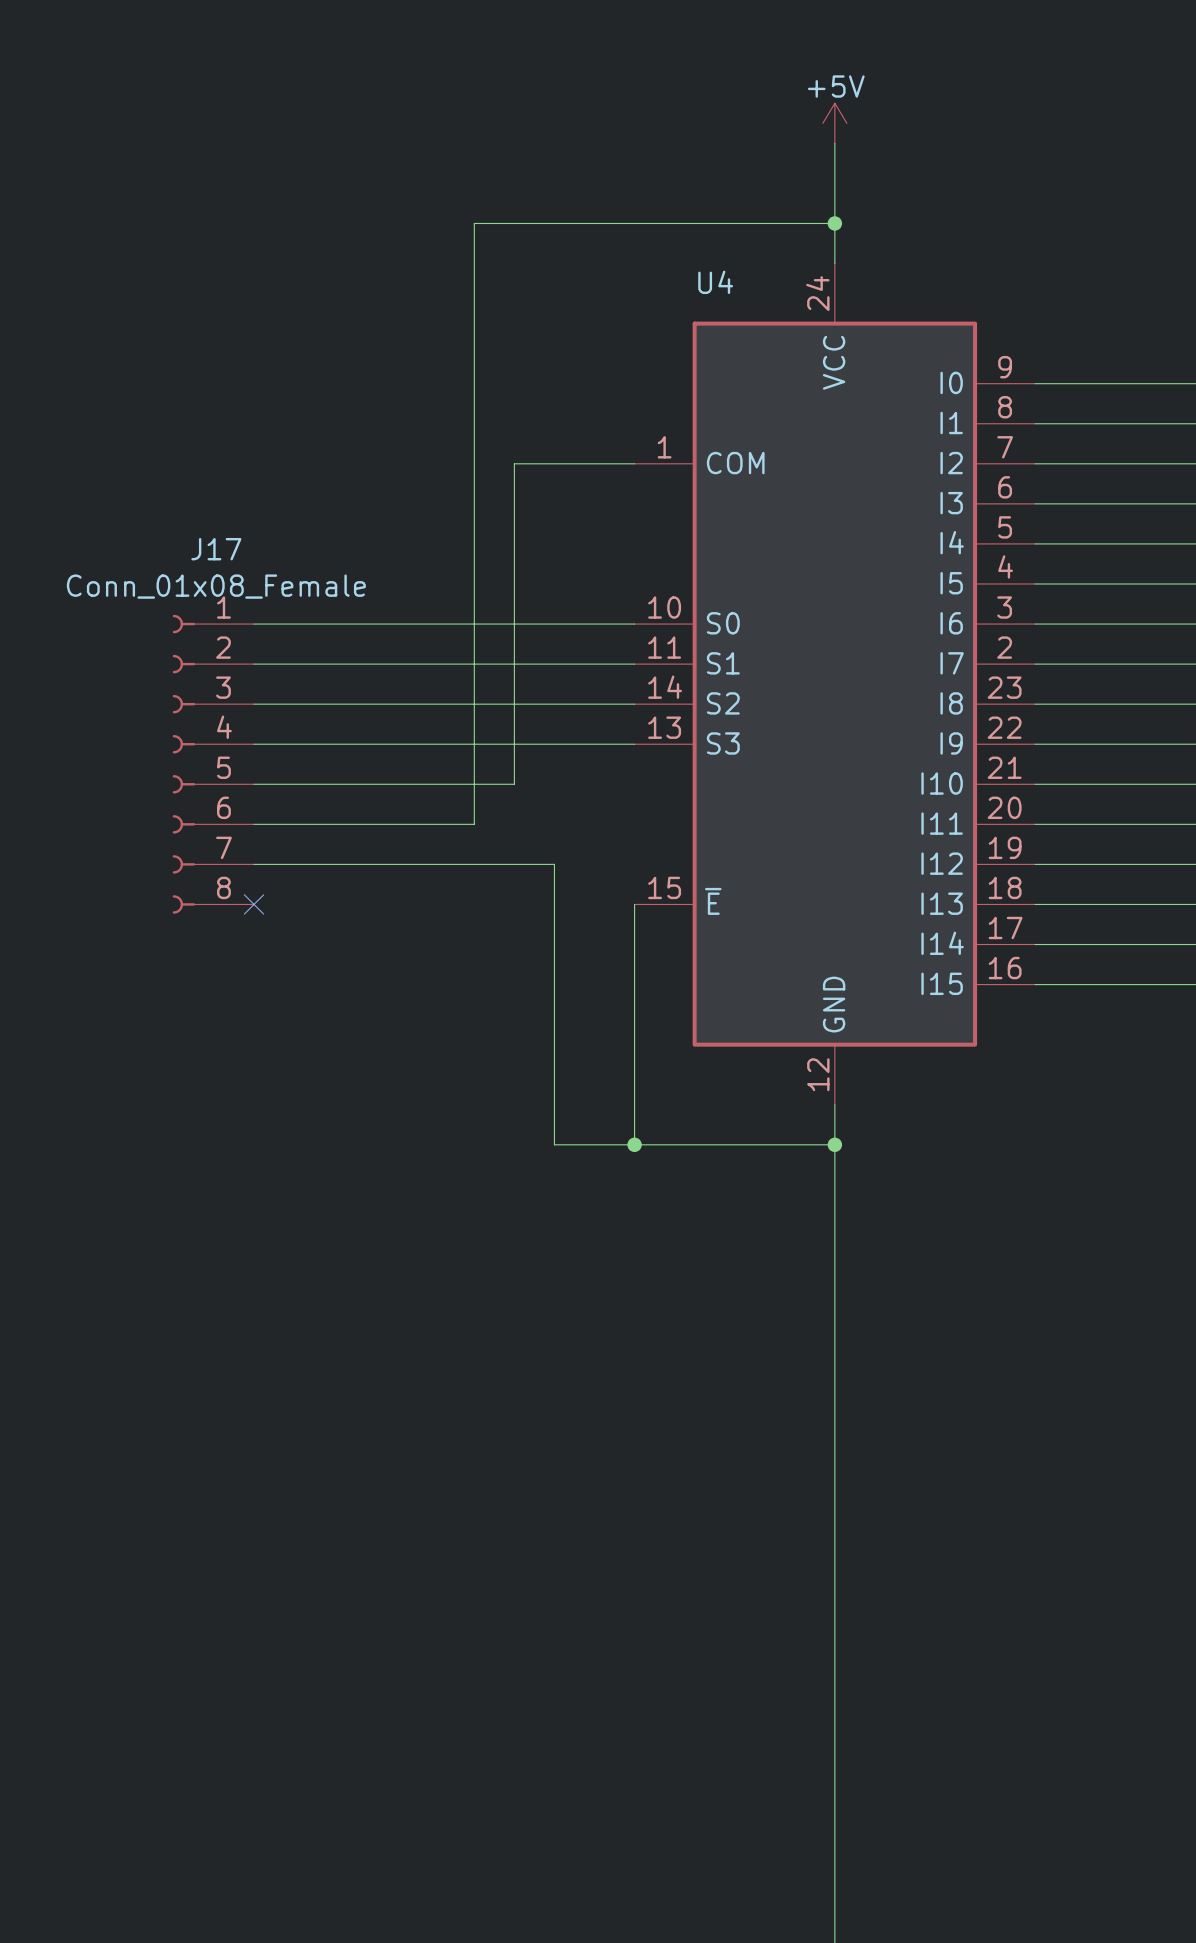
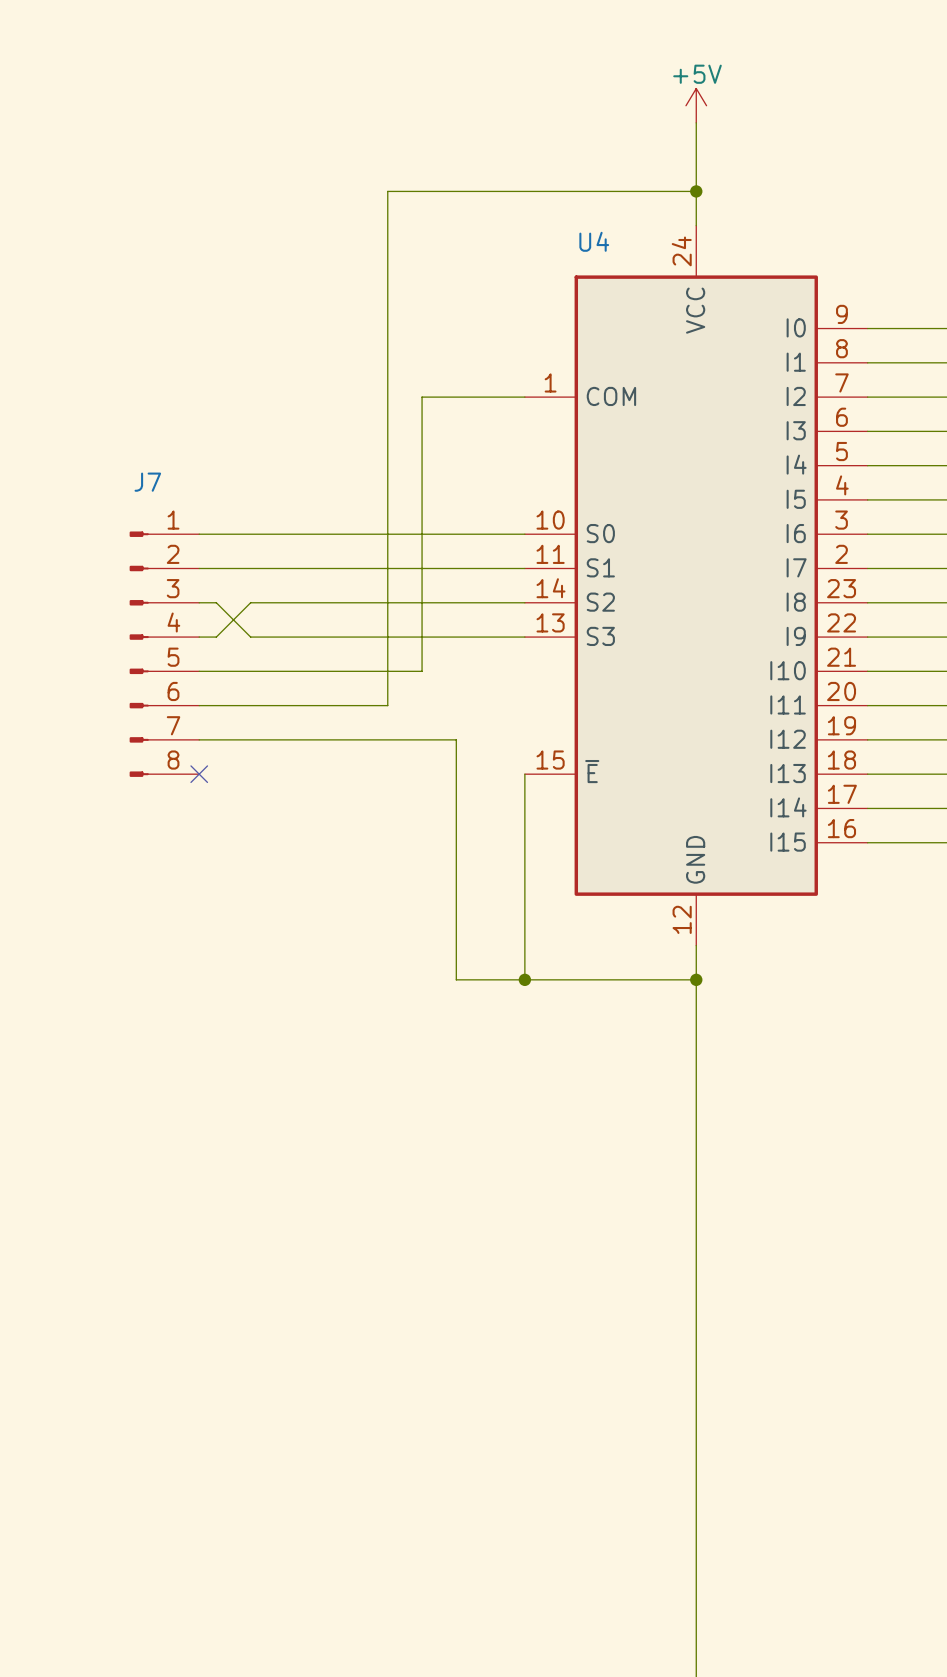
wire: (274, 704) (314, 704) -> (216, 602) (250, 637)
wire: (274, 744) (314, 744) -> (216, 637) (250, 602)
J17: Conn_01x08_Female (213, 764) -> none
J7: none -> (164, 654)

